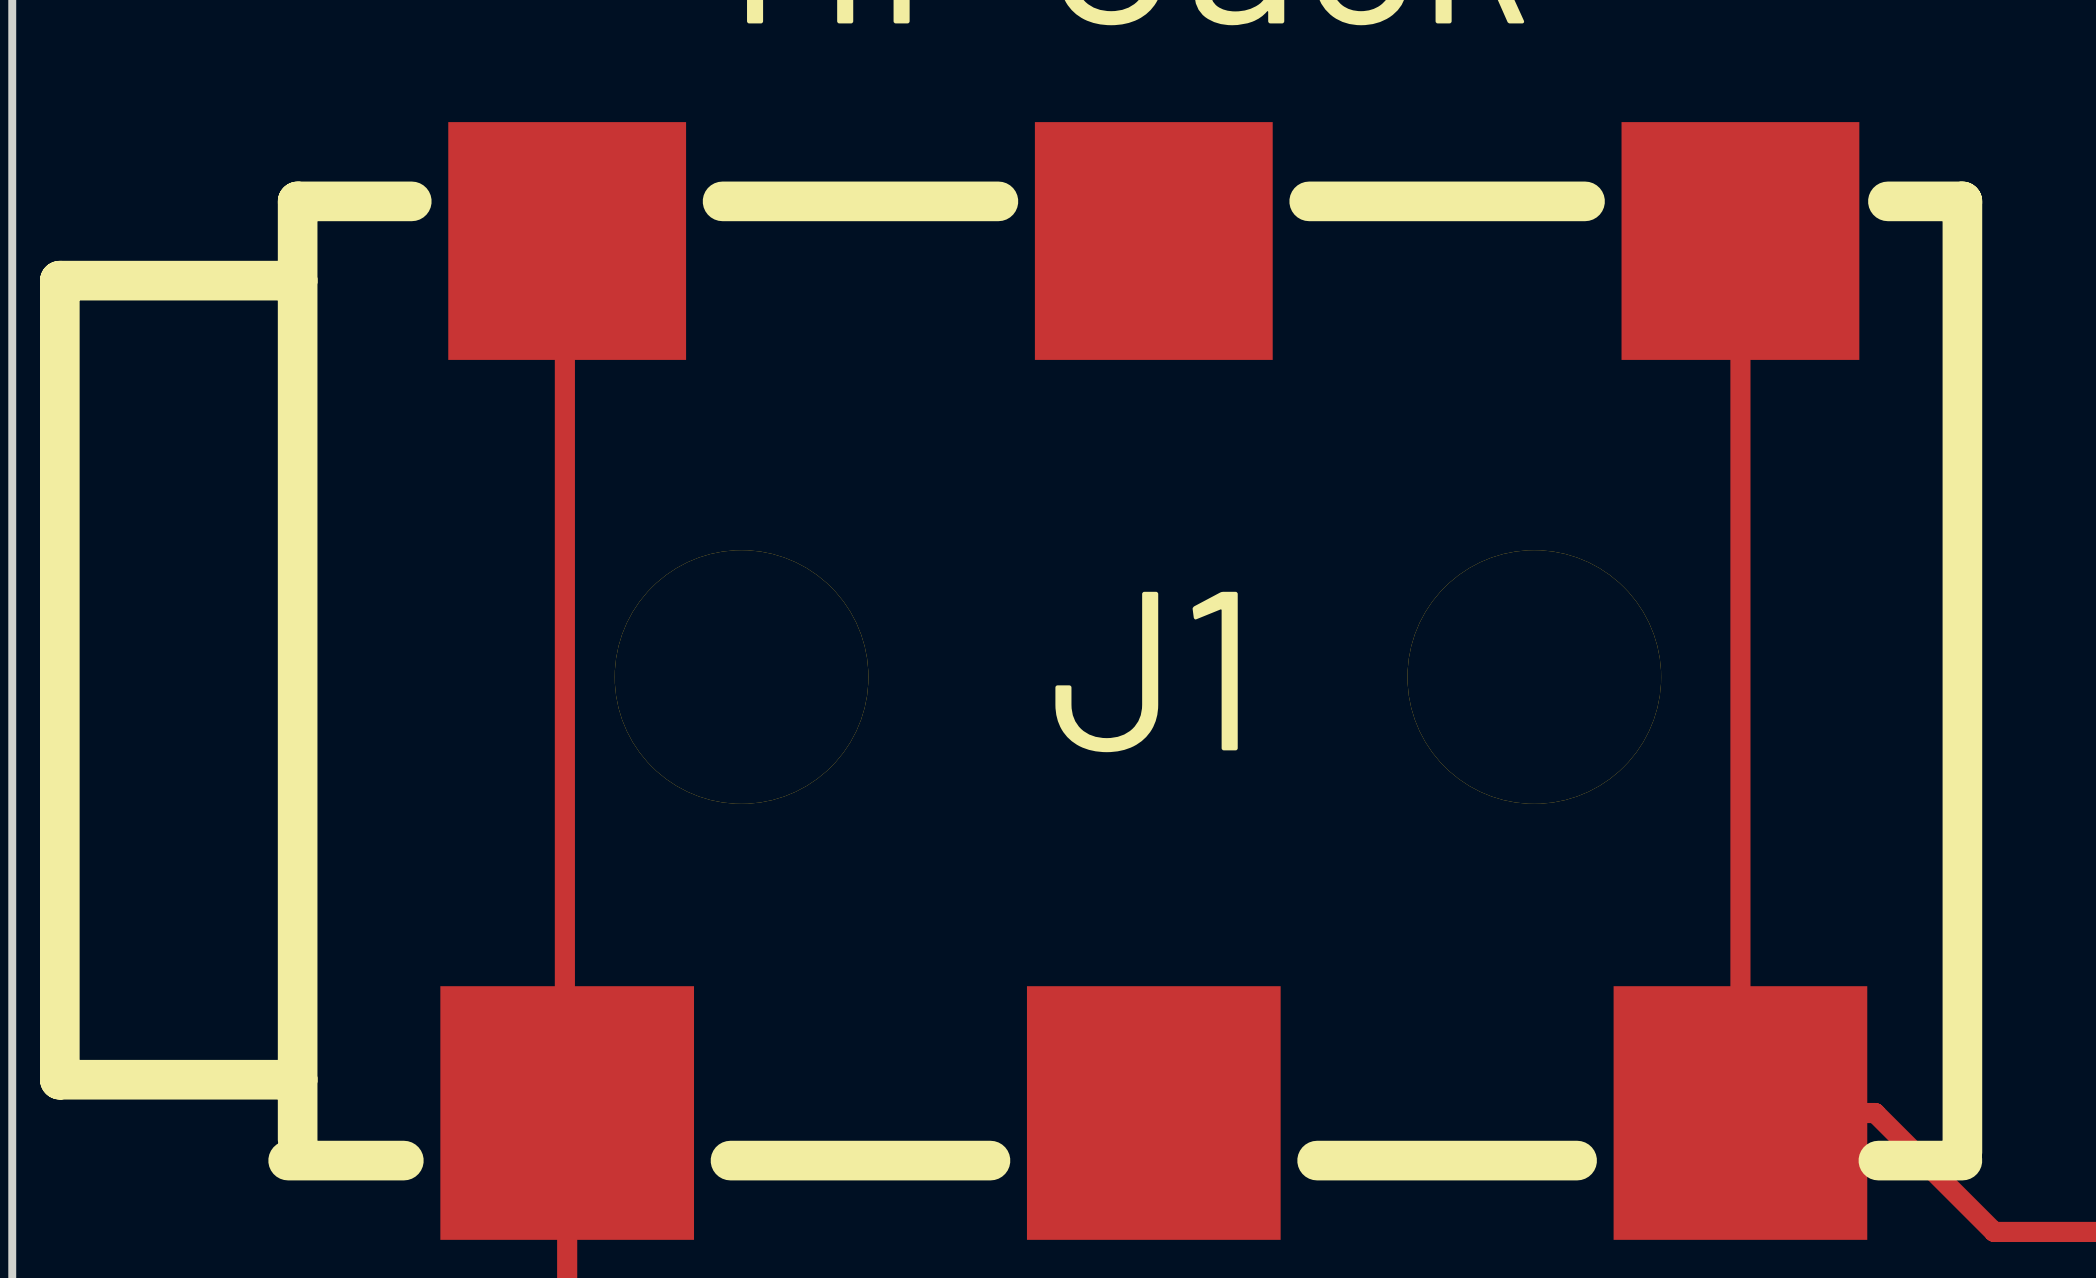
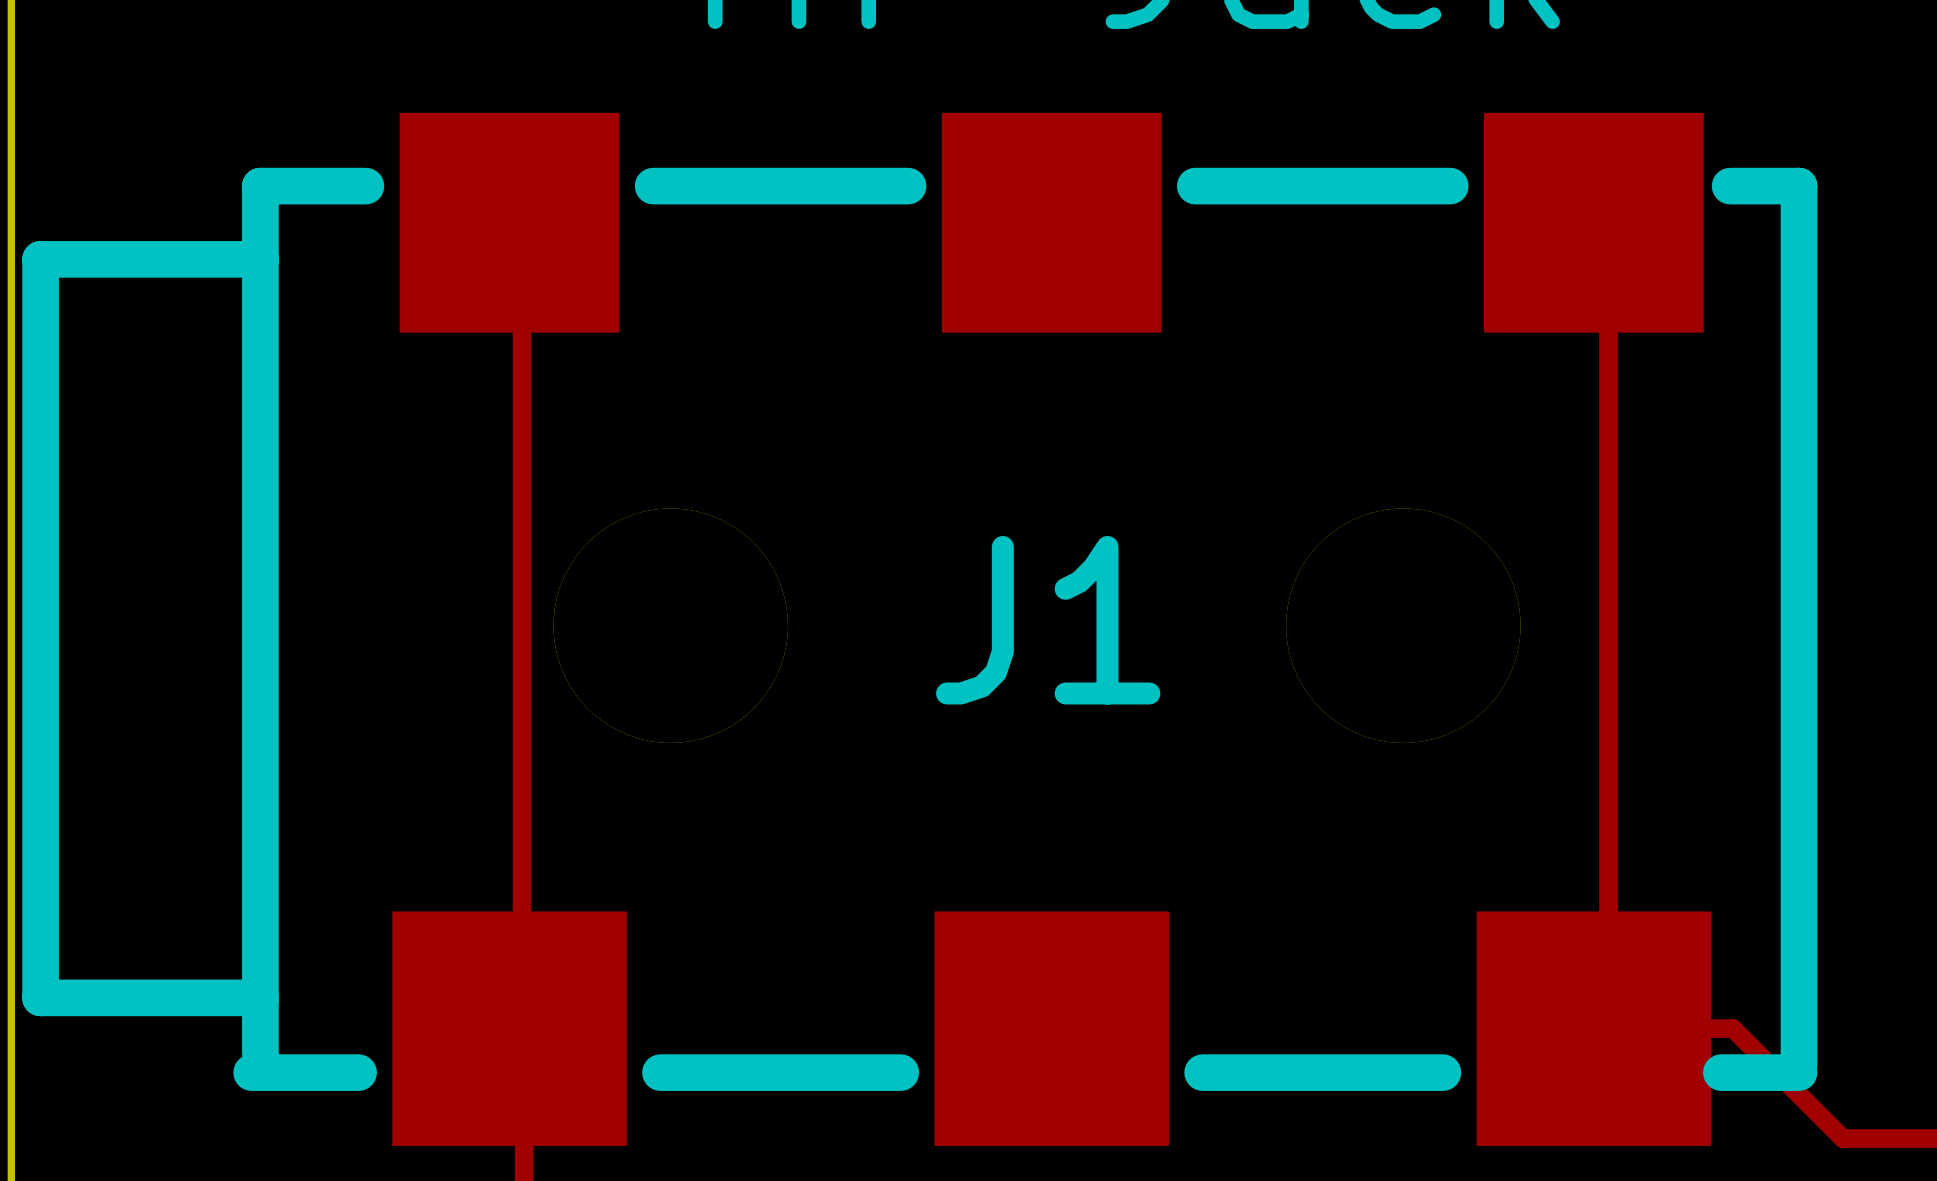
J1 position: (1011, 680) -> (919, 629)

